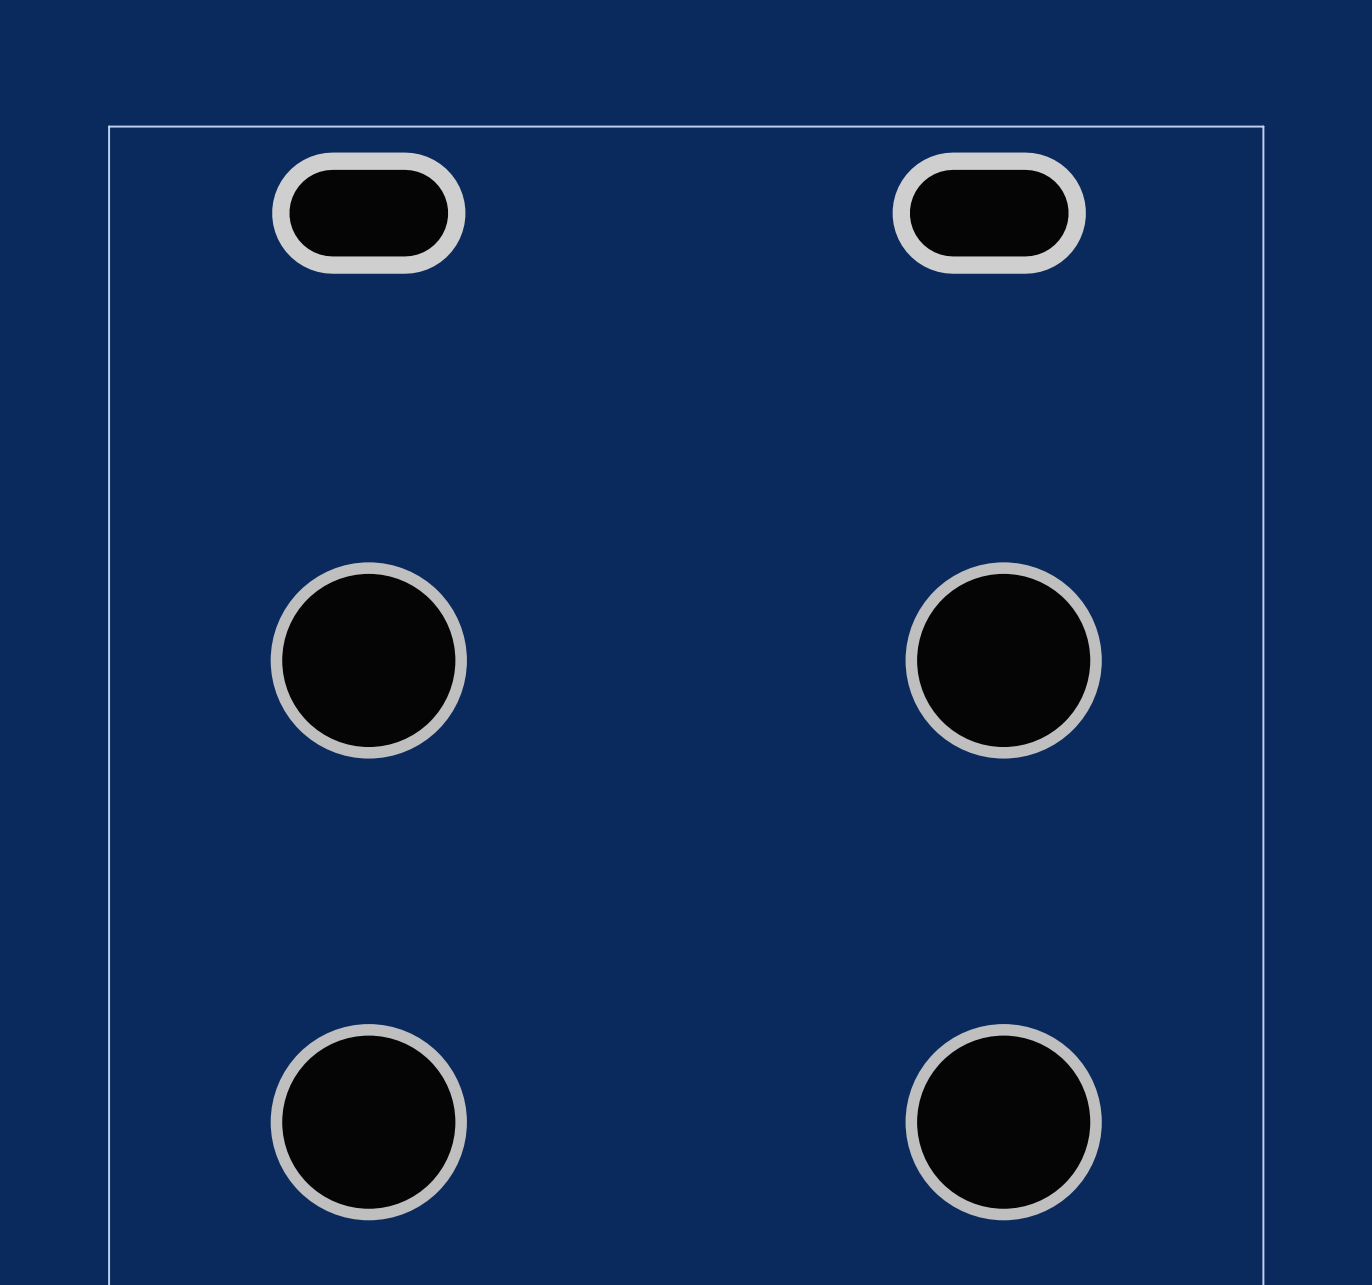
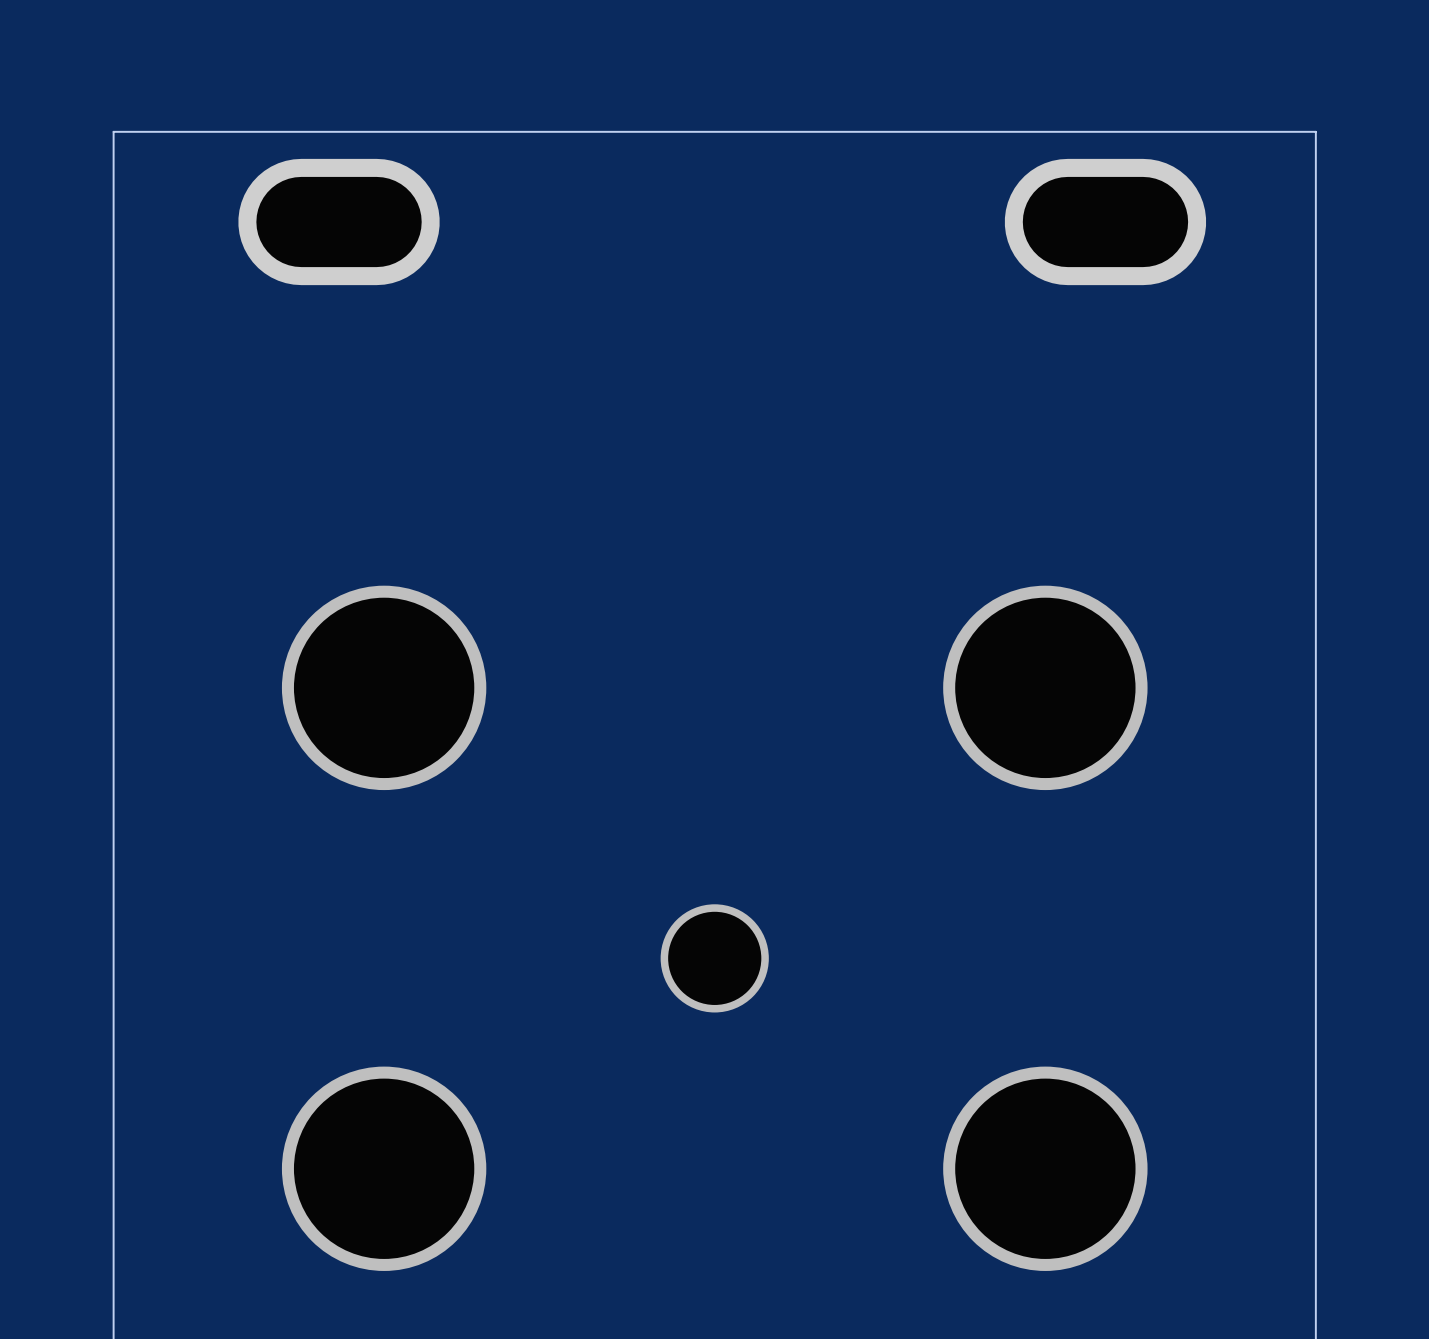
part position: (368, 213) -> (339, 222)
part position: (989, 213) -> (1105, 222)
via: none -> (714, 958)

